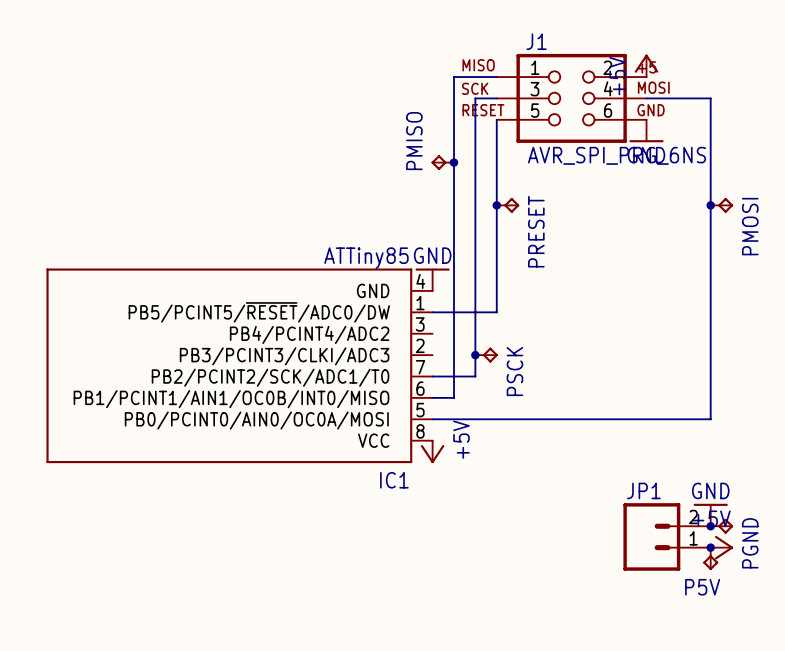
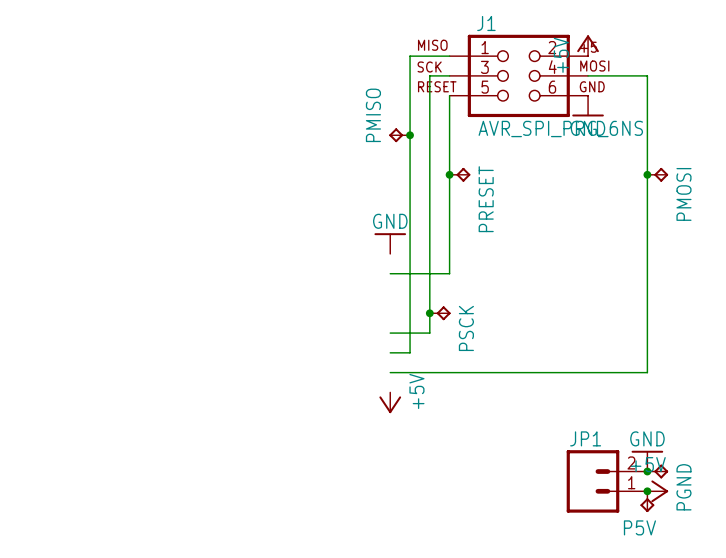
IC1: ATTiny85 (239, 365) -> none

